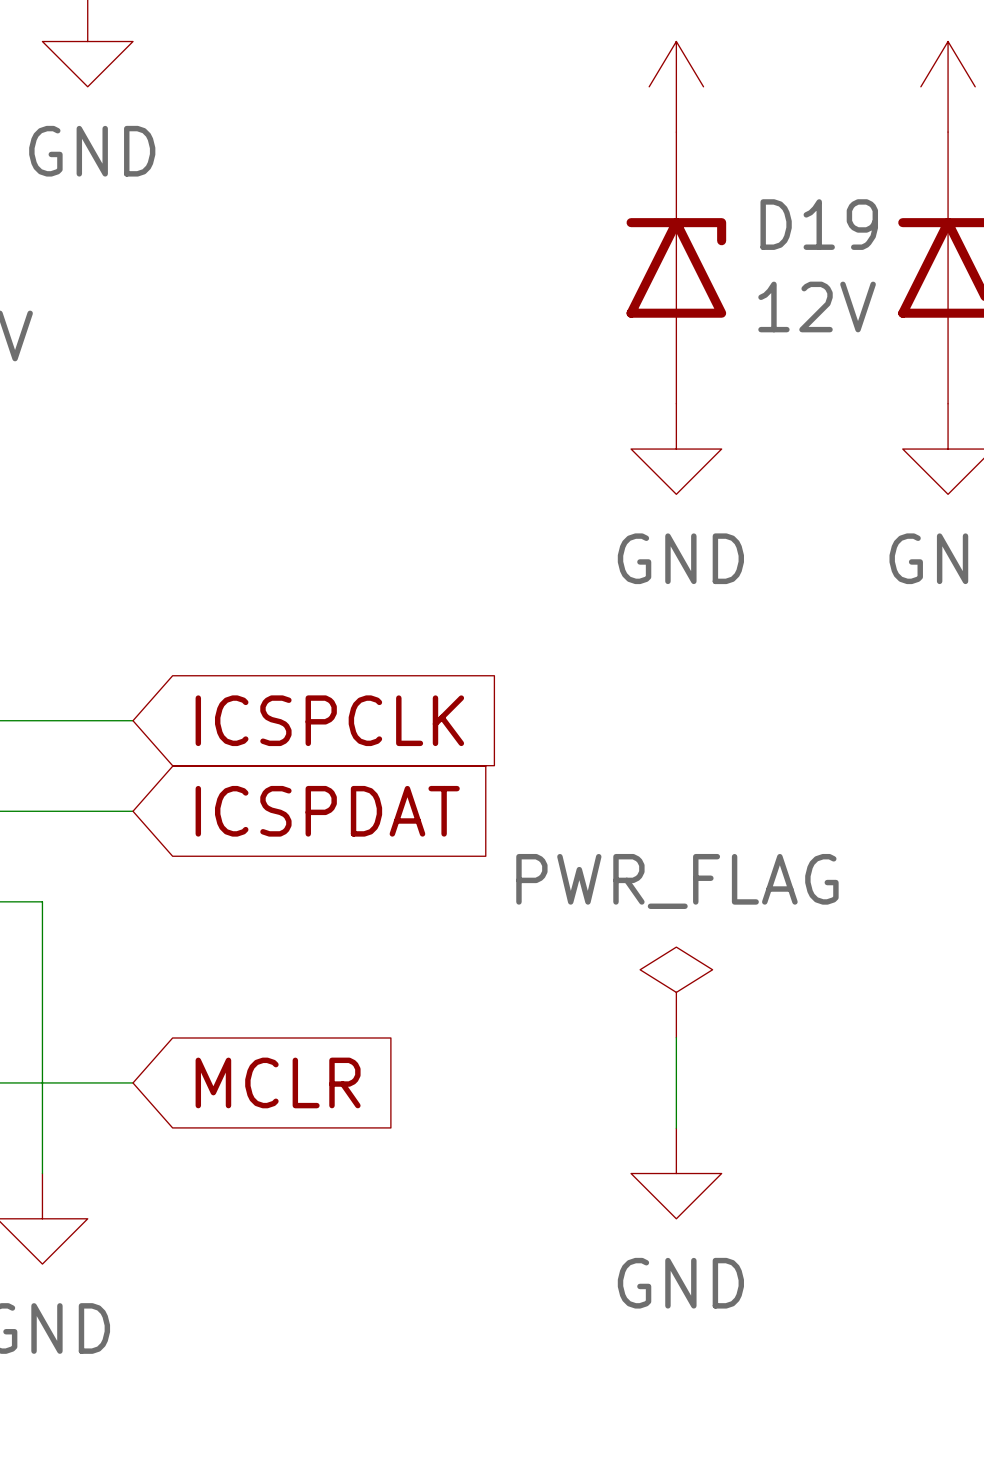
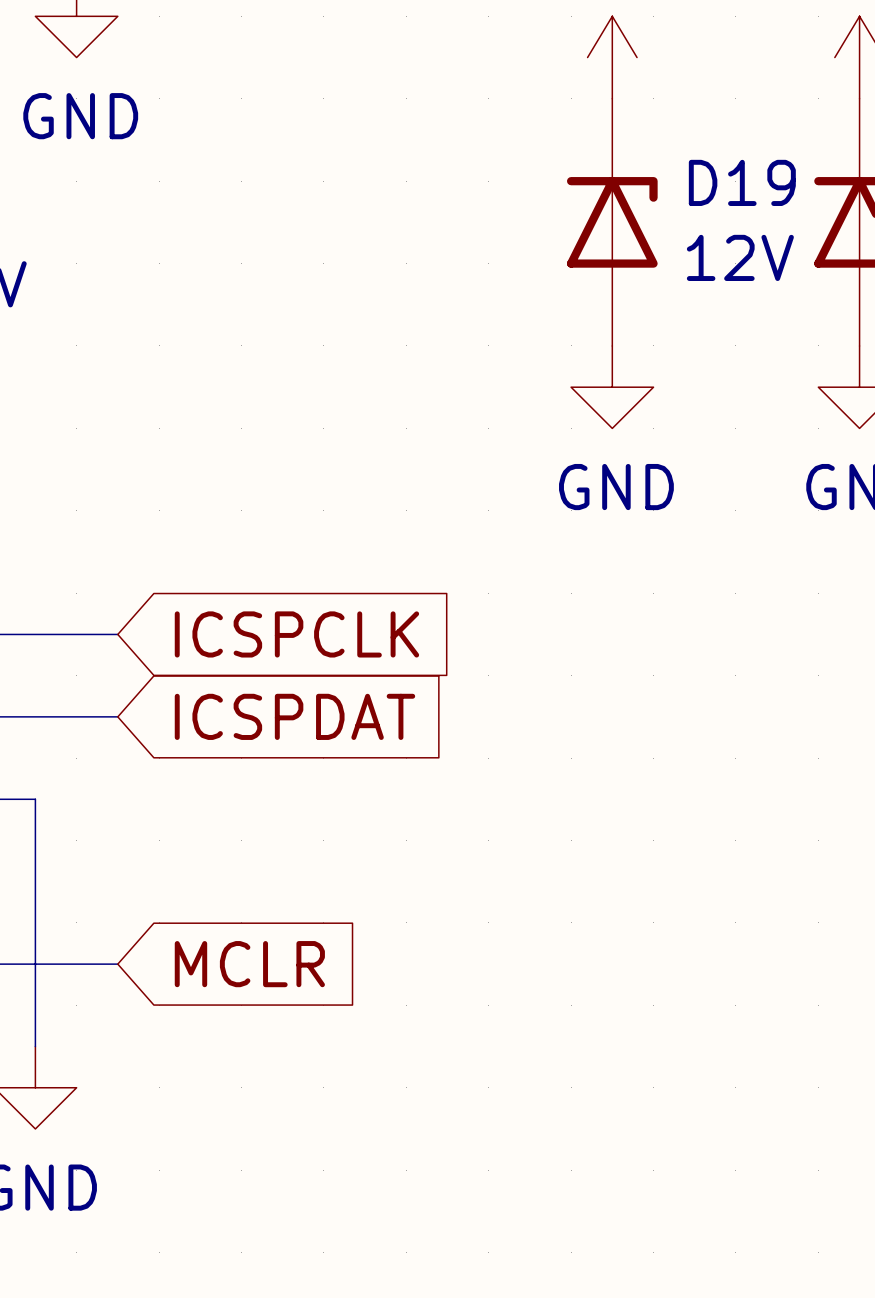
power symbol: PWR_FLAG (676, 992) -> none
wire: (676, 1037) (676, 1128) -> none
power symbol: GND (676, 1173) -> none

